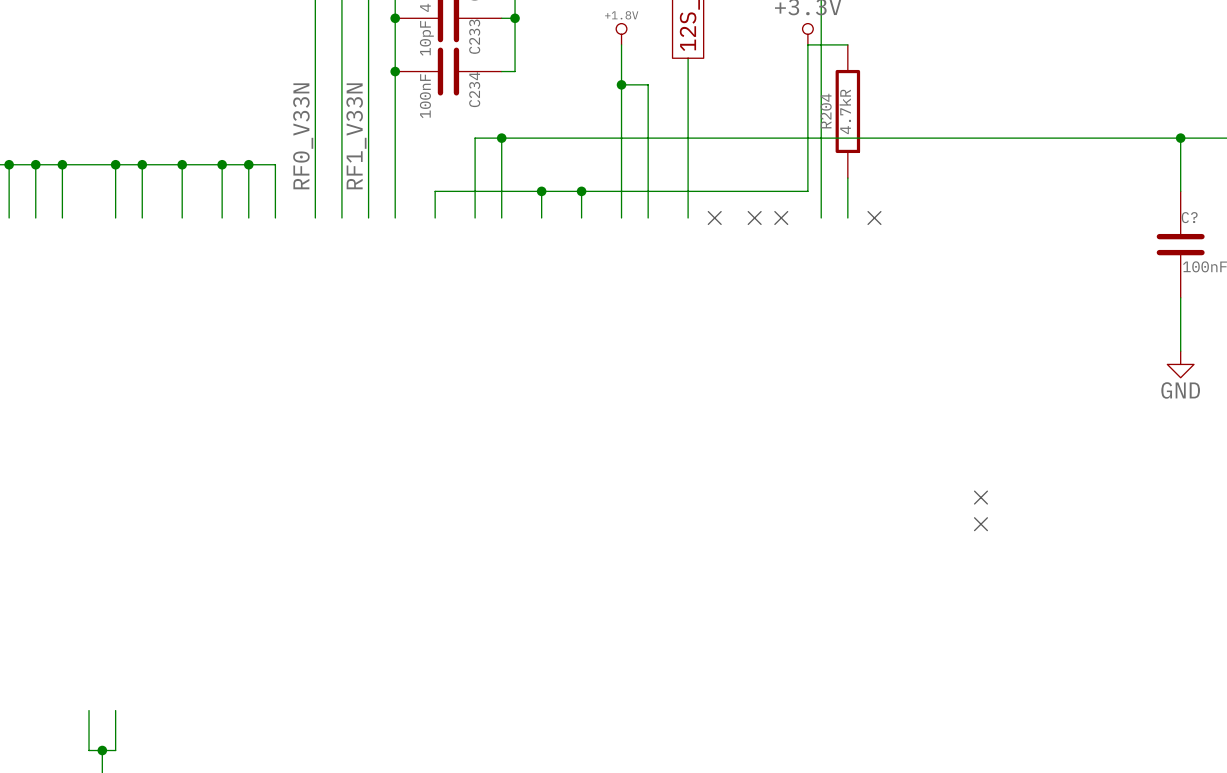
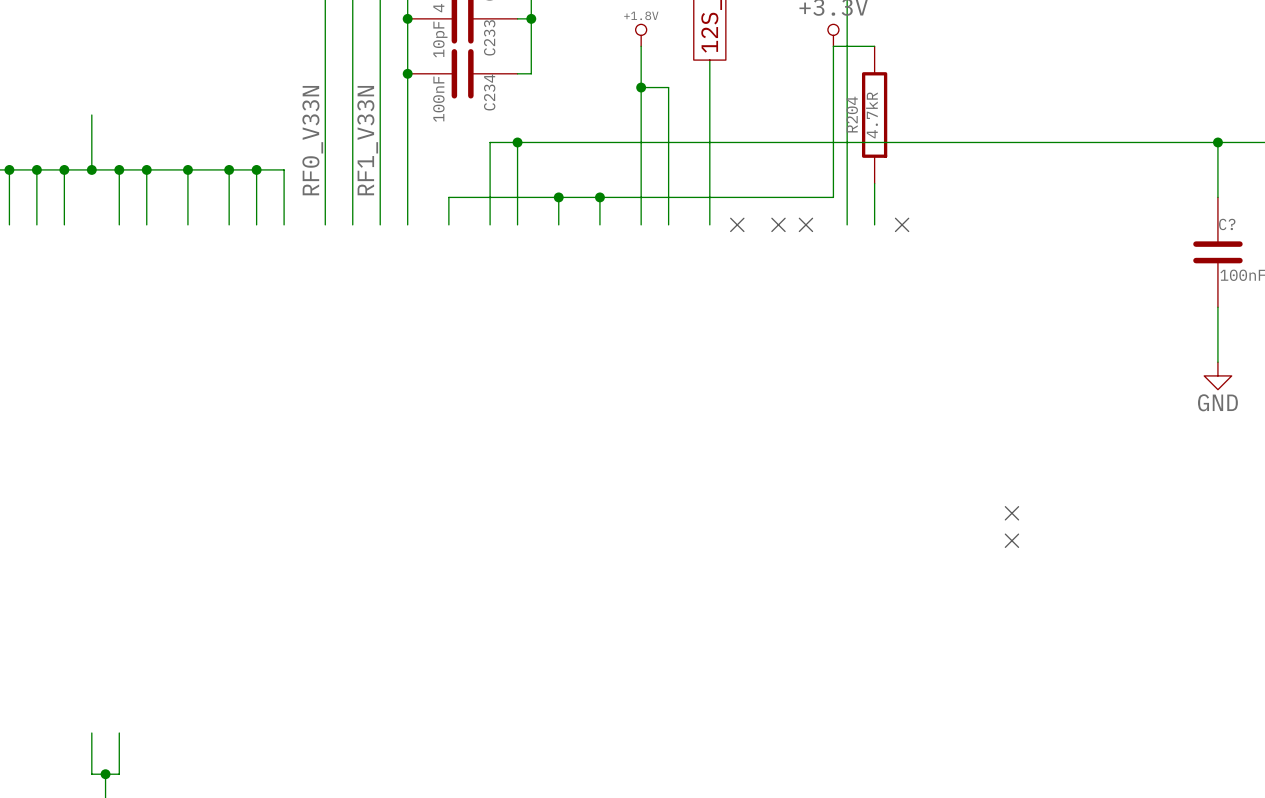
wire: none -> (91, 115) (91, 169)
junction: none -> (91, 169)

